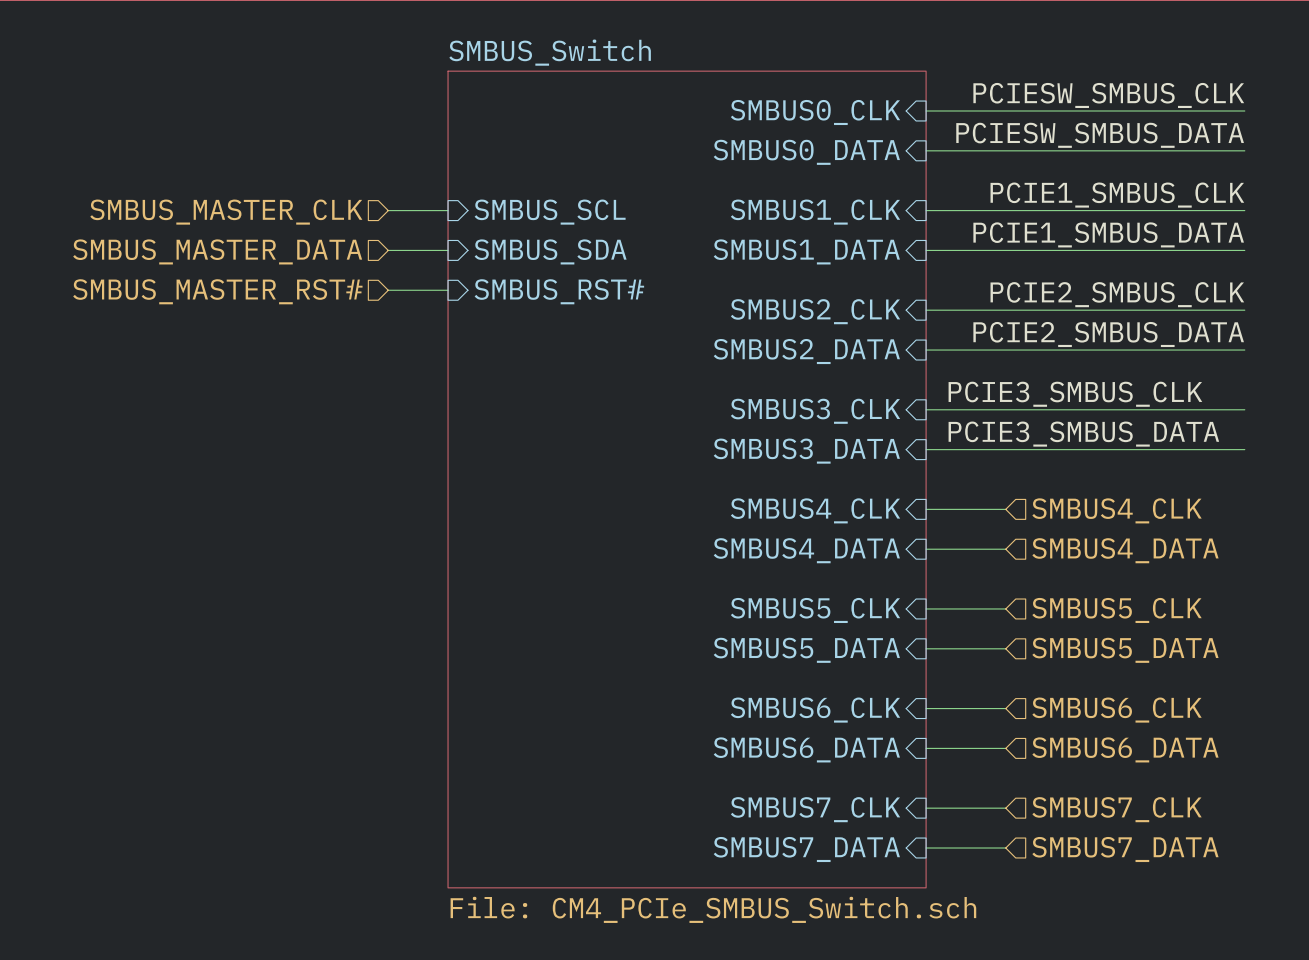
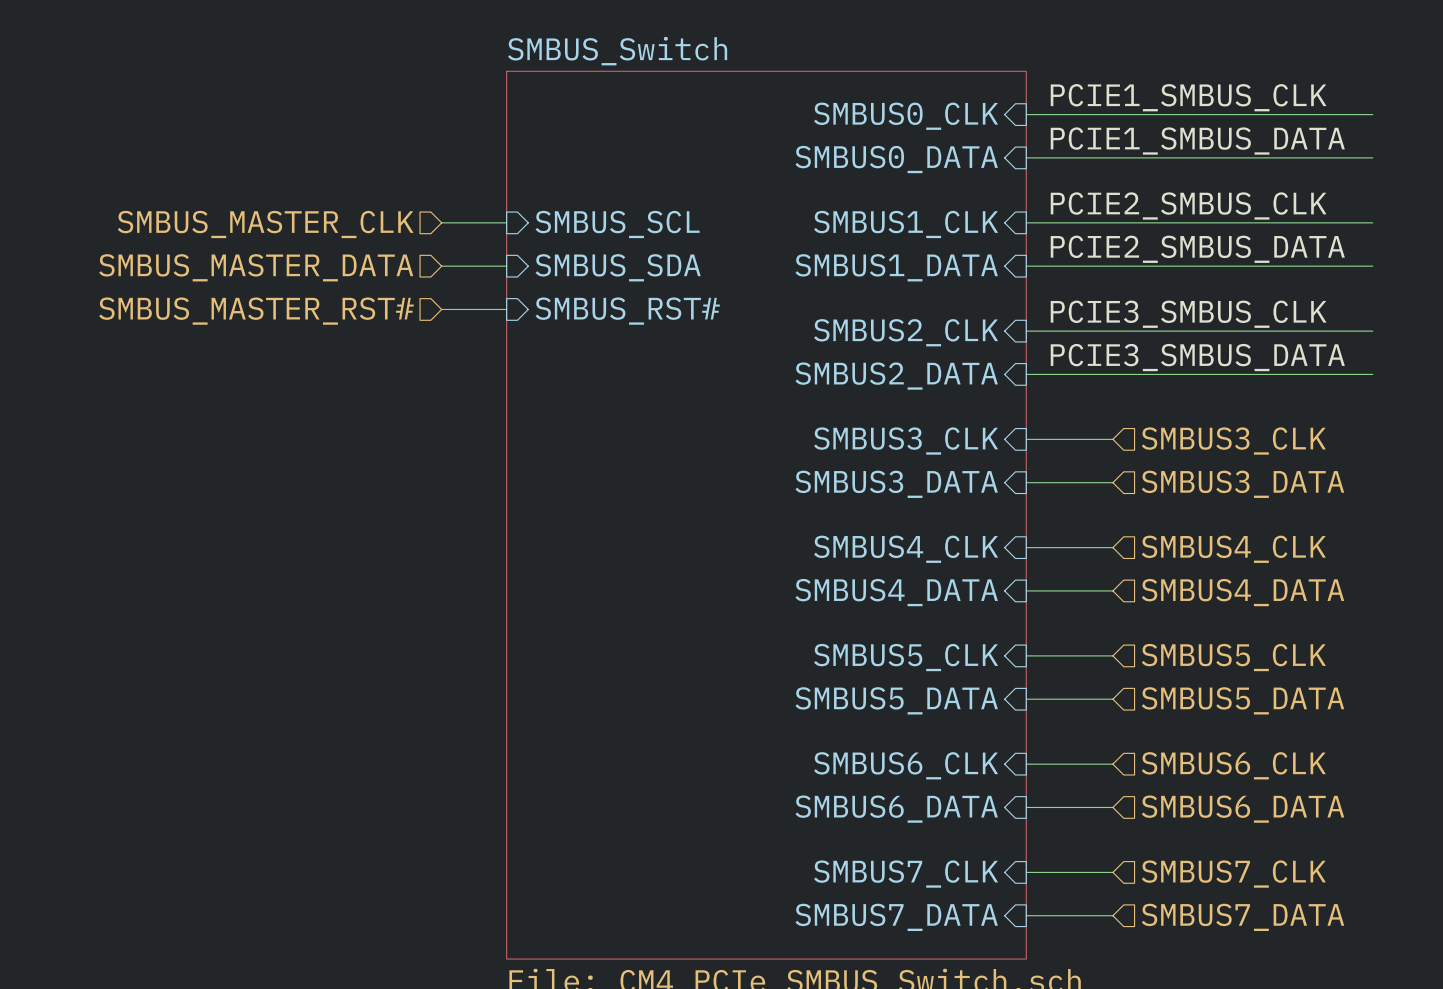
label: PCIESW_SMBUS_CLK (1108, 95) -> none
label: PCIESW_SMBUS_DATA (1100, 135) -> none
label position: PCIE1_SMBUS_CLK (1117, 195) -> PCIE1_SMBUS_CLK (1188, 97)
label position: PCIE1_SMBUS_DATA (1108, 234) -> PCIE1_SMBUS_DATA (1197, 141)
label position: PCIE2_SMBUS_CLK (1117, 294) -> PCIE2_SMBUS_CLK (1188, 205)
label position: PCIE2_SMBUS_DATA (1108, 334) -> PCIE2_SMBUS_DATA (1197, 249)
label position: PCIE3_SMBUS_CLK (1075, 394) -> PCIE3_SMBUS_CLK (1188, 314)
wire: (1005, 409) (1244, 409) -> none
hierarchical label: none -> SMBUS3_CLK (1233, 441)
label position: PCIE3_SMBUS_DATA (1083, 434) -> PCIE3_SMBUS_DATA (1197, 357)
wire: (1005, 449) (1244, 449) -> none
hierarchical label: none -> SMBUS3_DATA (1243, 484)

